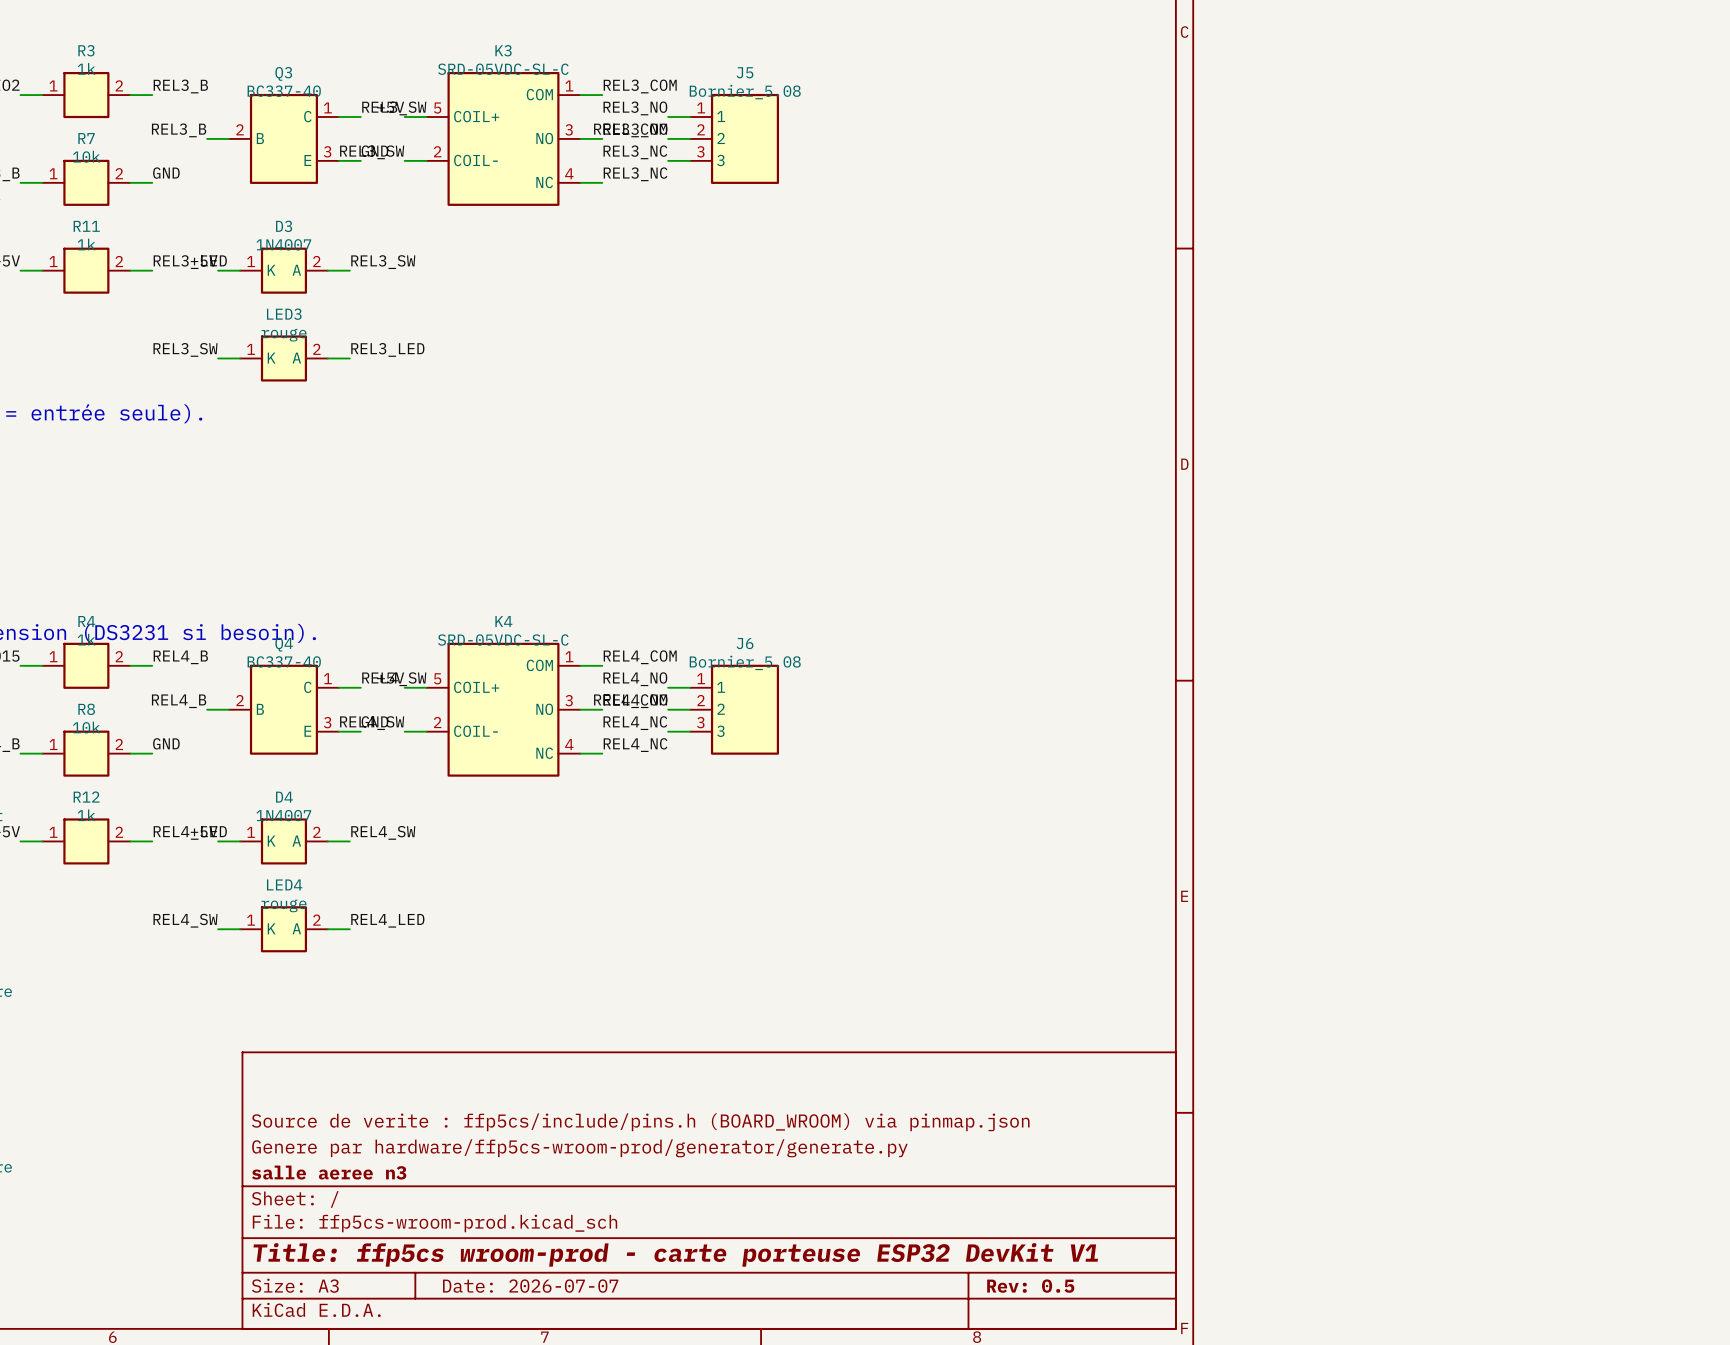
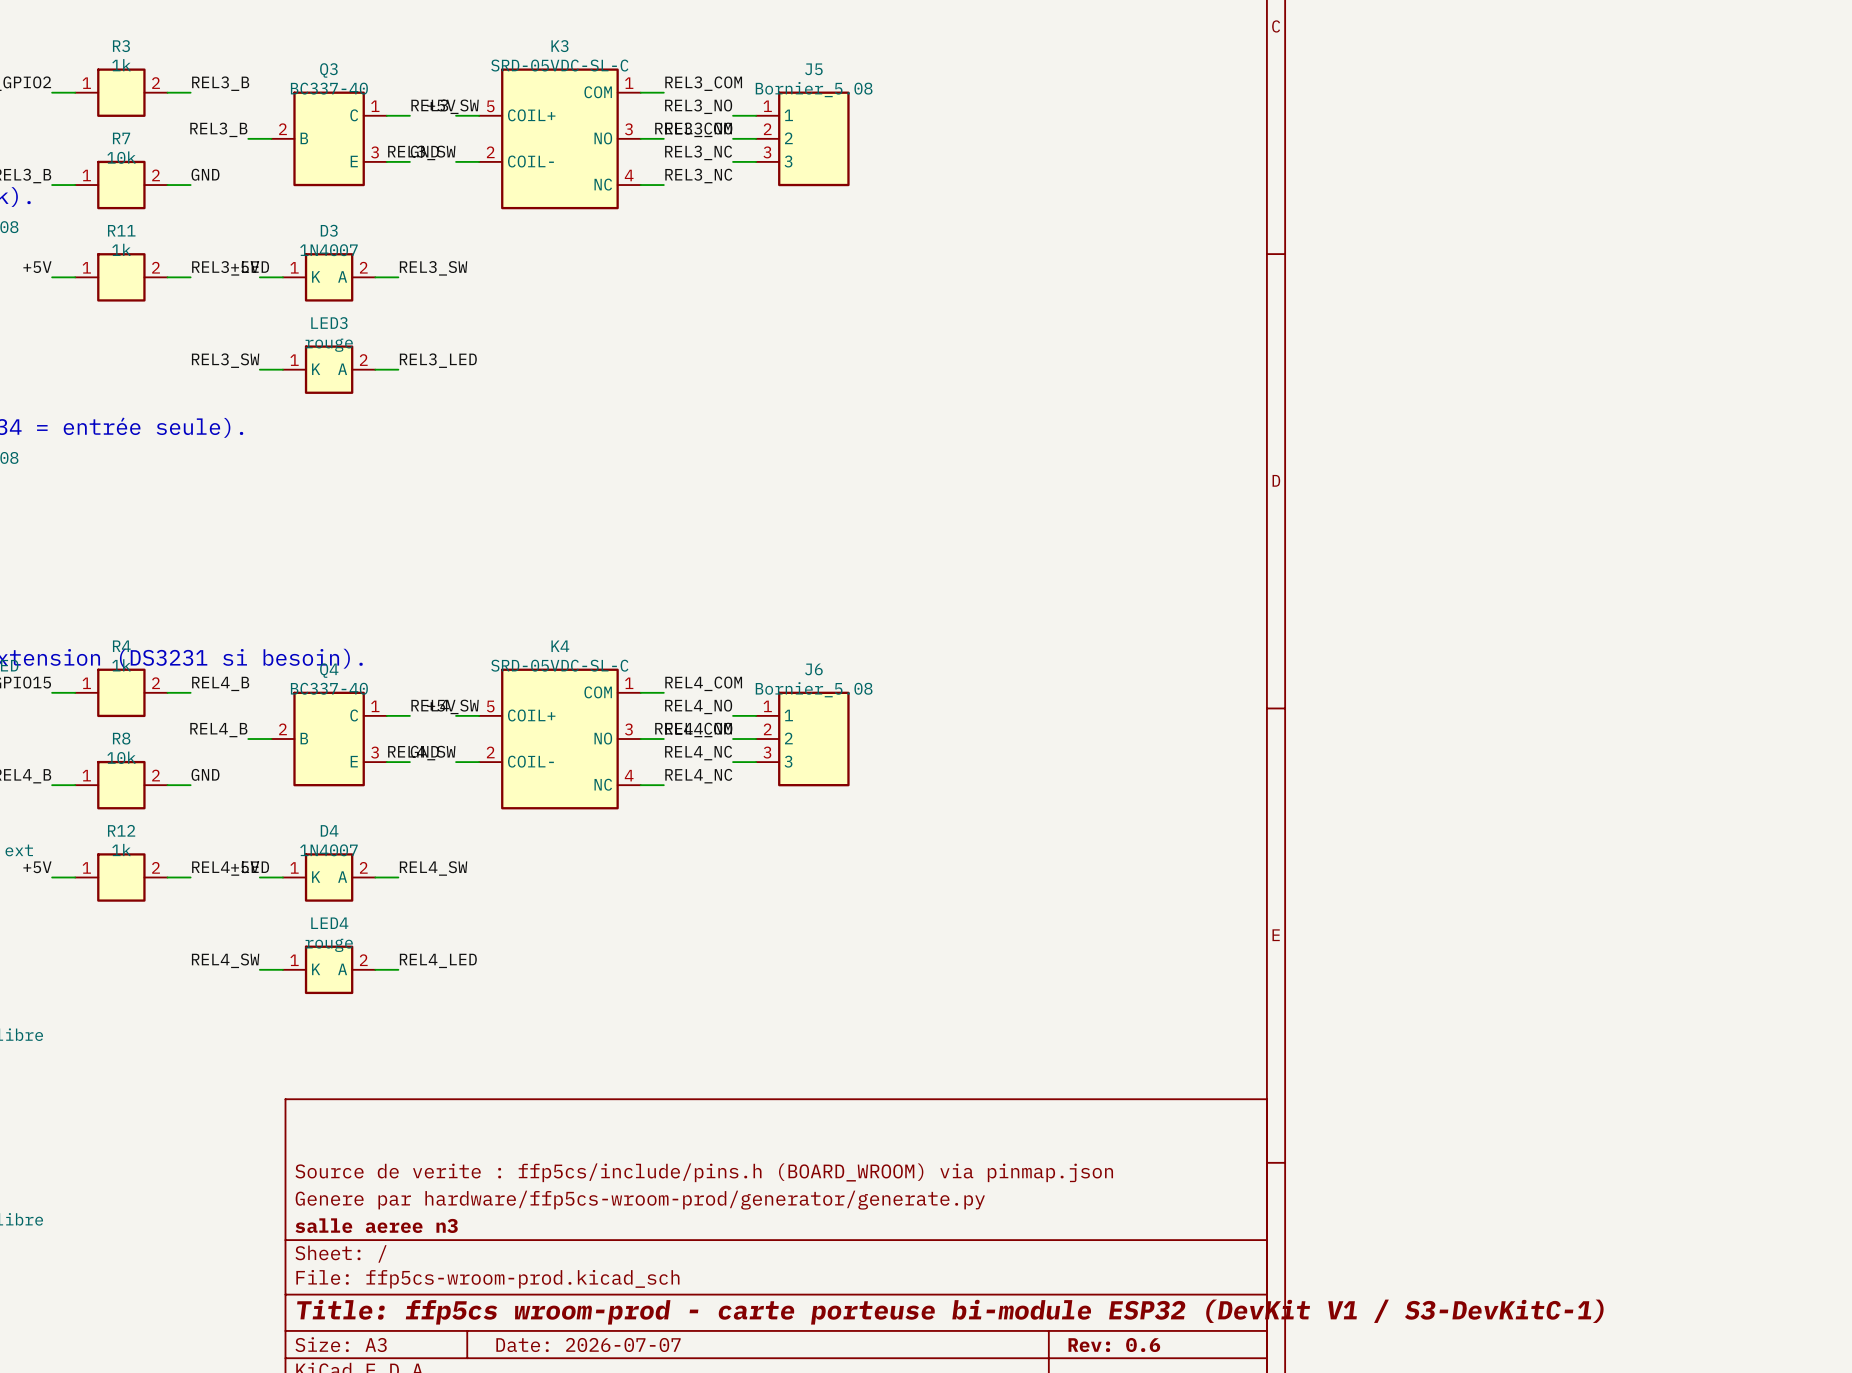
title block: Title: ffp5cs wroom-prod - carte porteuse ESP32 DevKit V1 (675, 1254) -> Title: ffp5cs wroom-prod - carte porteuse bi-module ESP32 (DevKit V1 / S3-DevKitC-1) (950, 1312)
title block: Rev: 0.5 (1030, 1286) -> Rev: 0.6 (1114, 1344)

